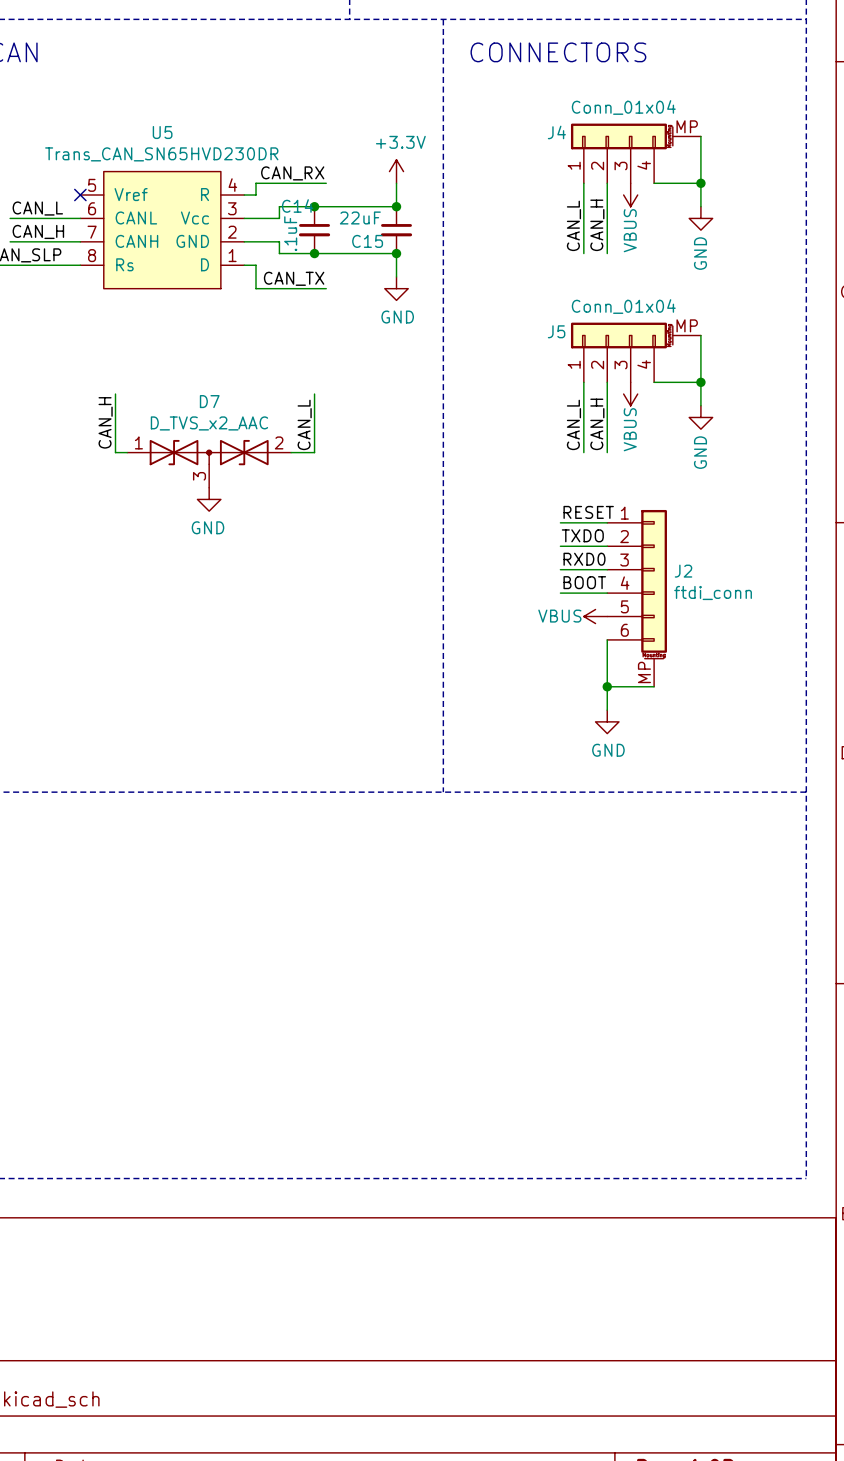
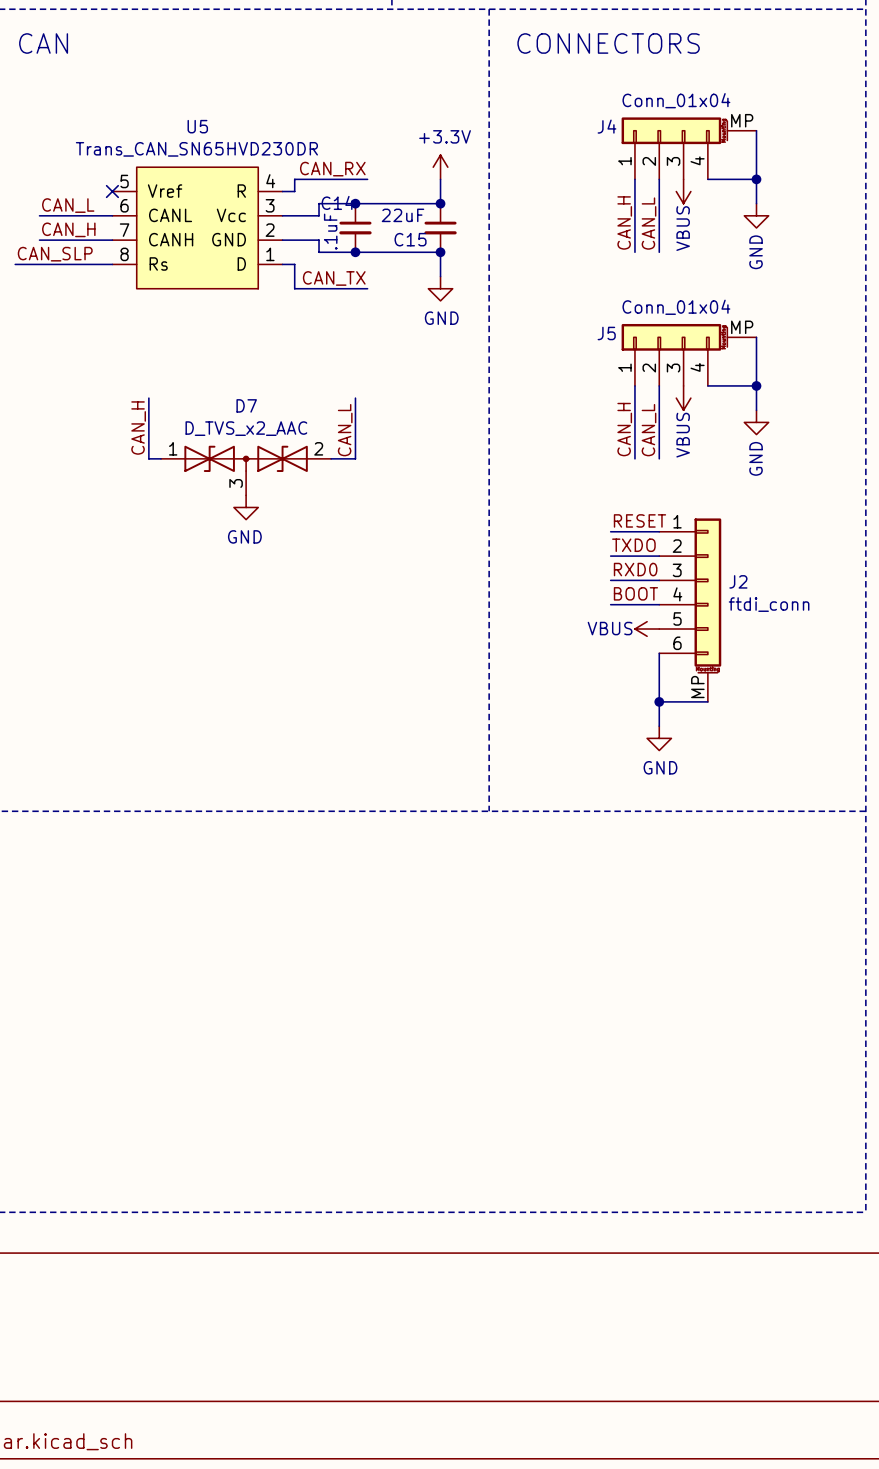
label: CAN_L (573, 225) -> CAN_H (624, 222)
label: CAN_H (597, 225) -> CAN_L (649, 223)
label: CAN_L (573, 424) -> CAN_H (624, 429)
label: CAN_H (597, 424) -> CAN_L (649, 430)

